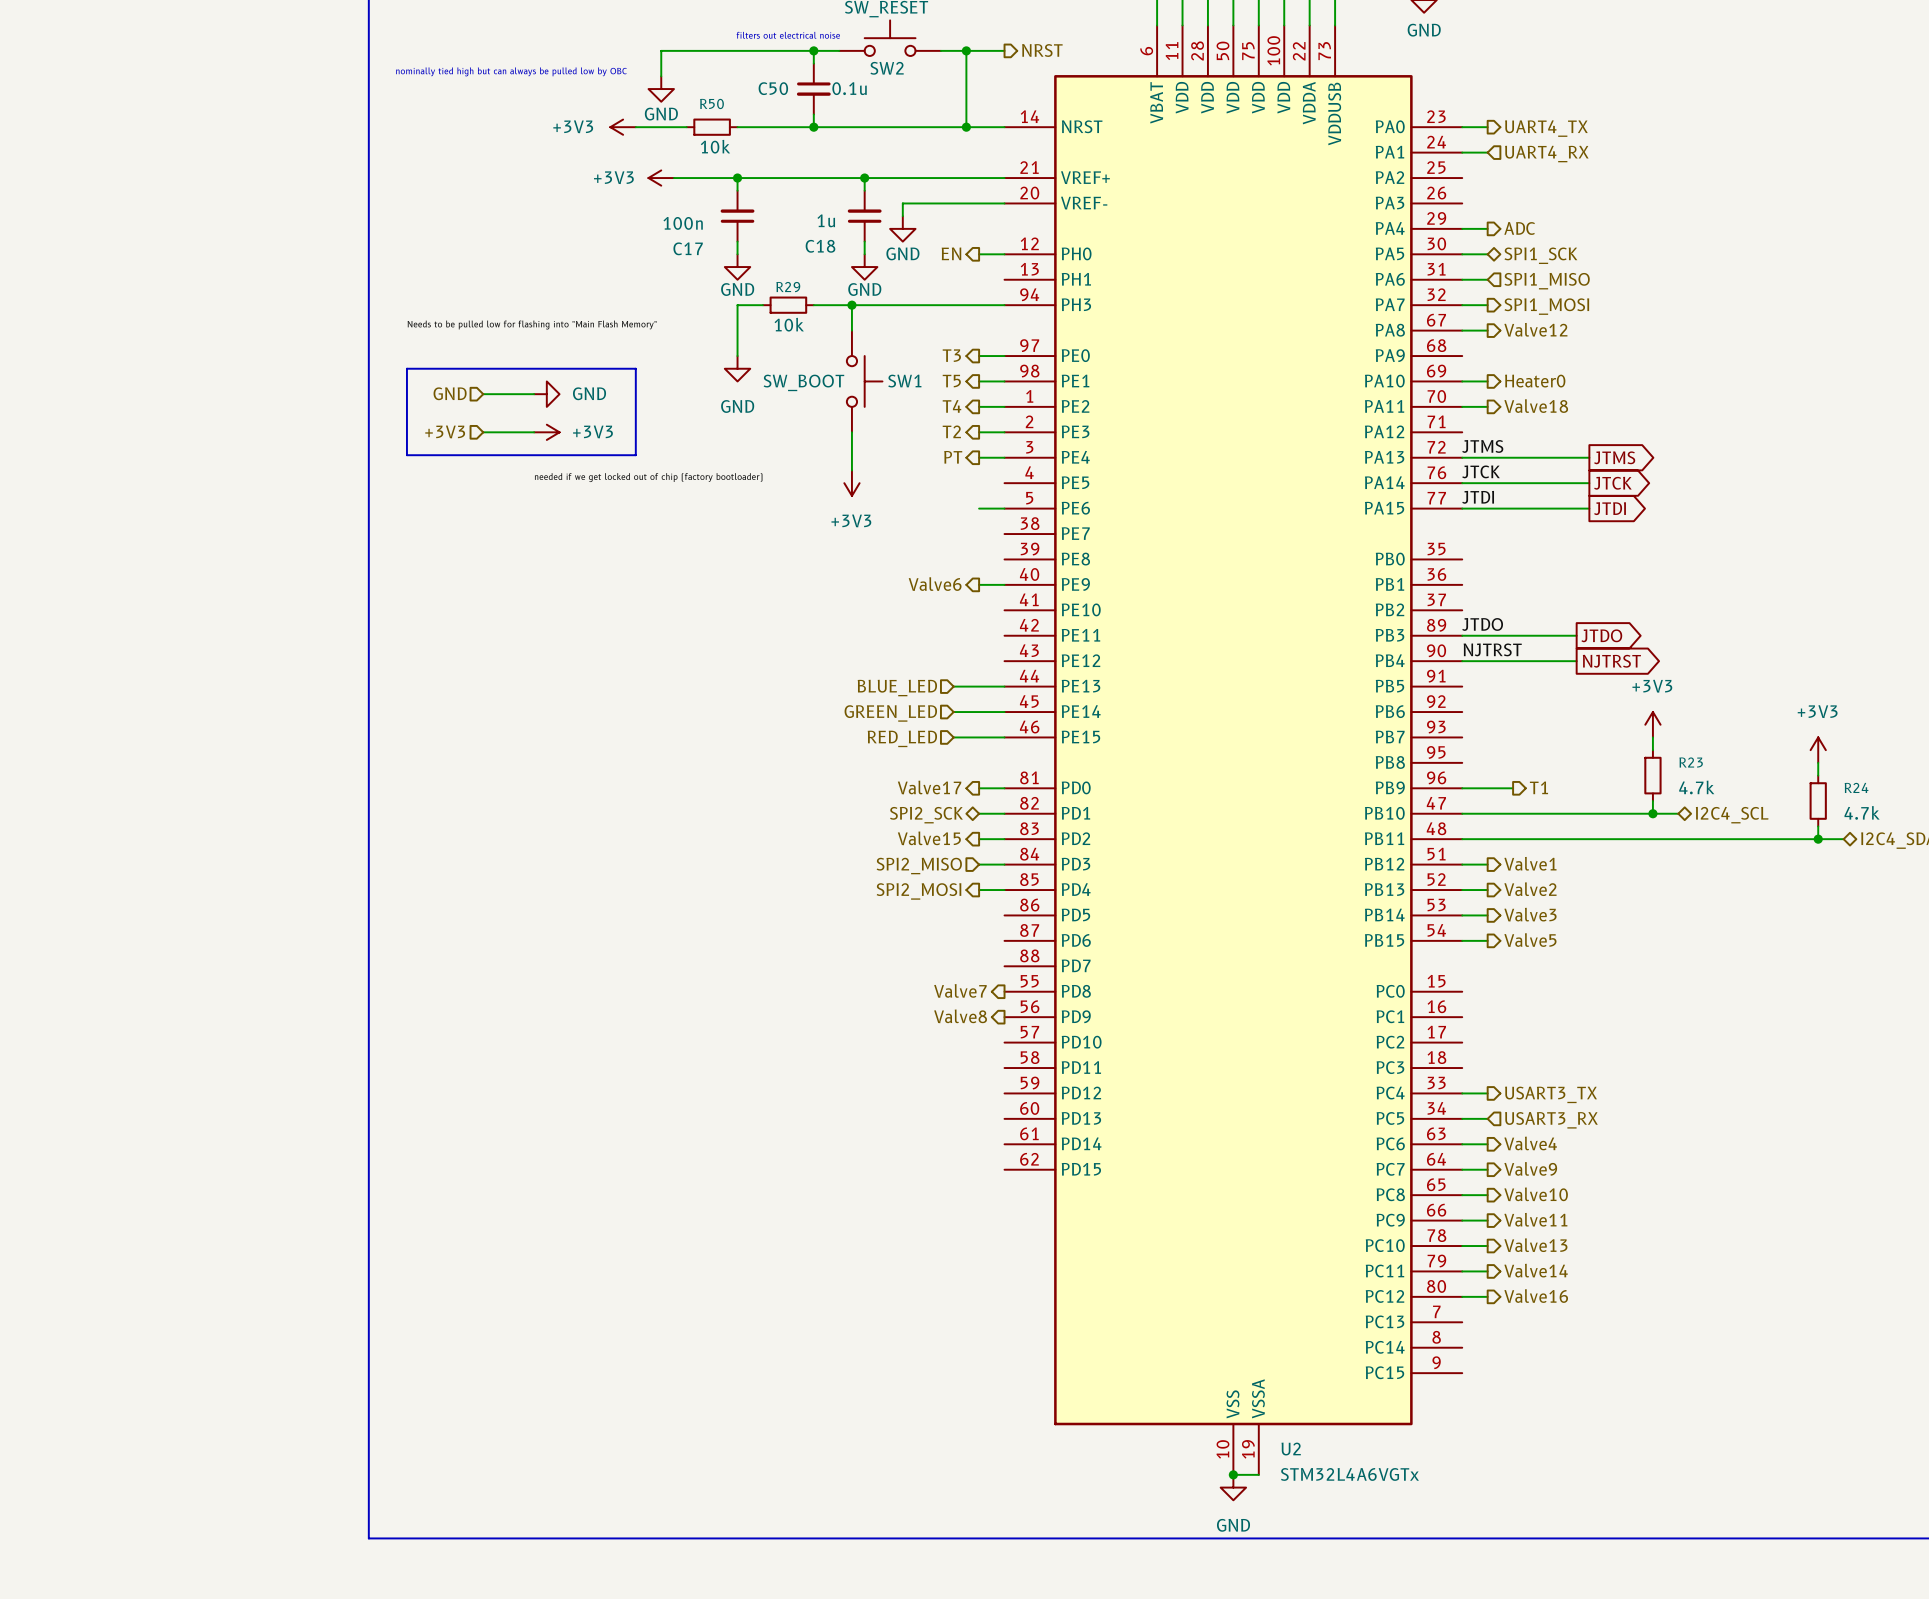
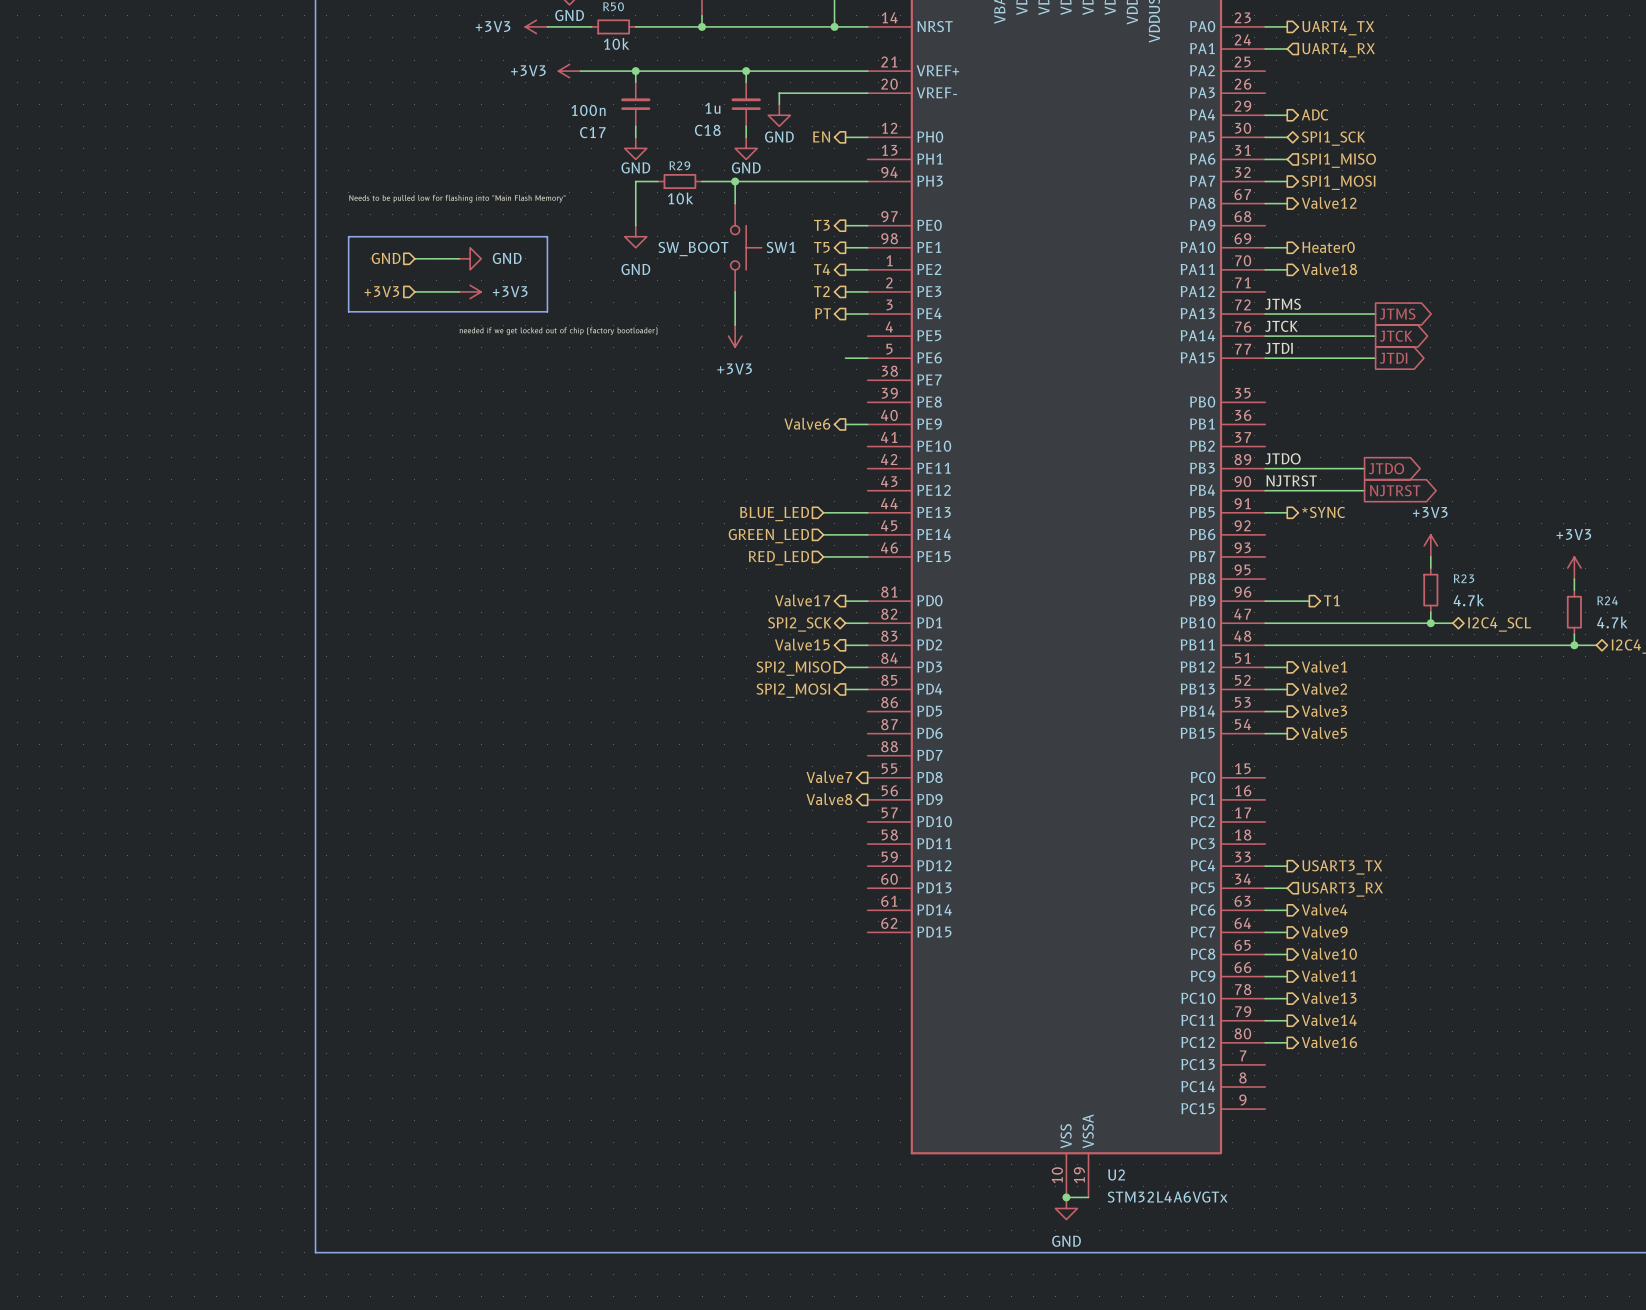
wire: none -> (1265, 512) (1287, 512)
hierarchical label: none -> *SYNC (1323, 512)

